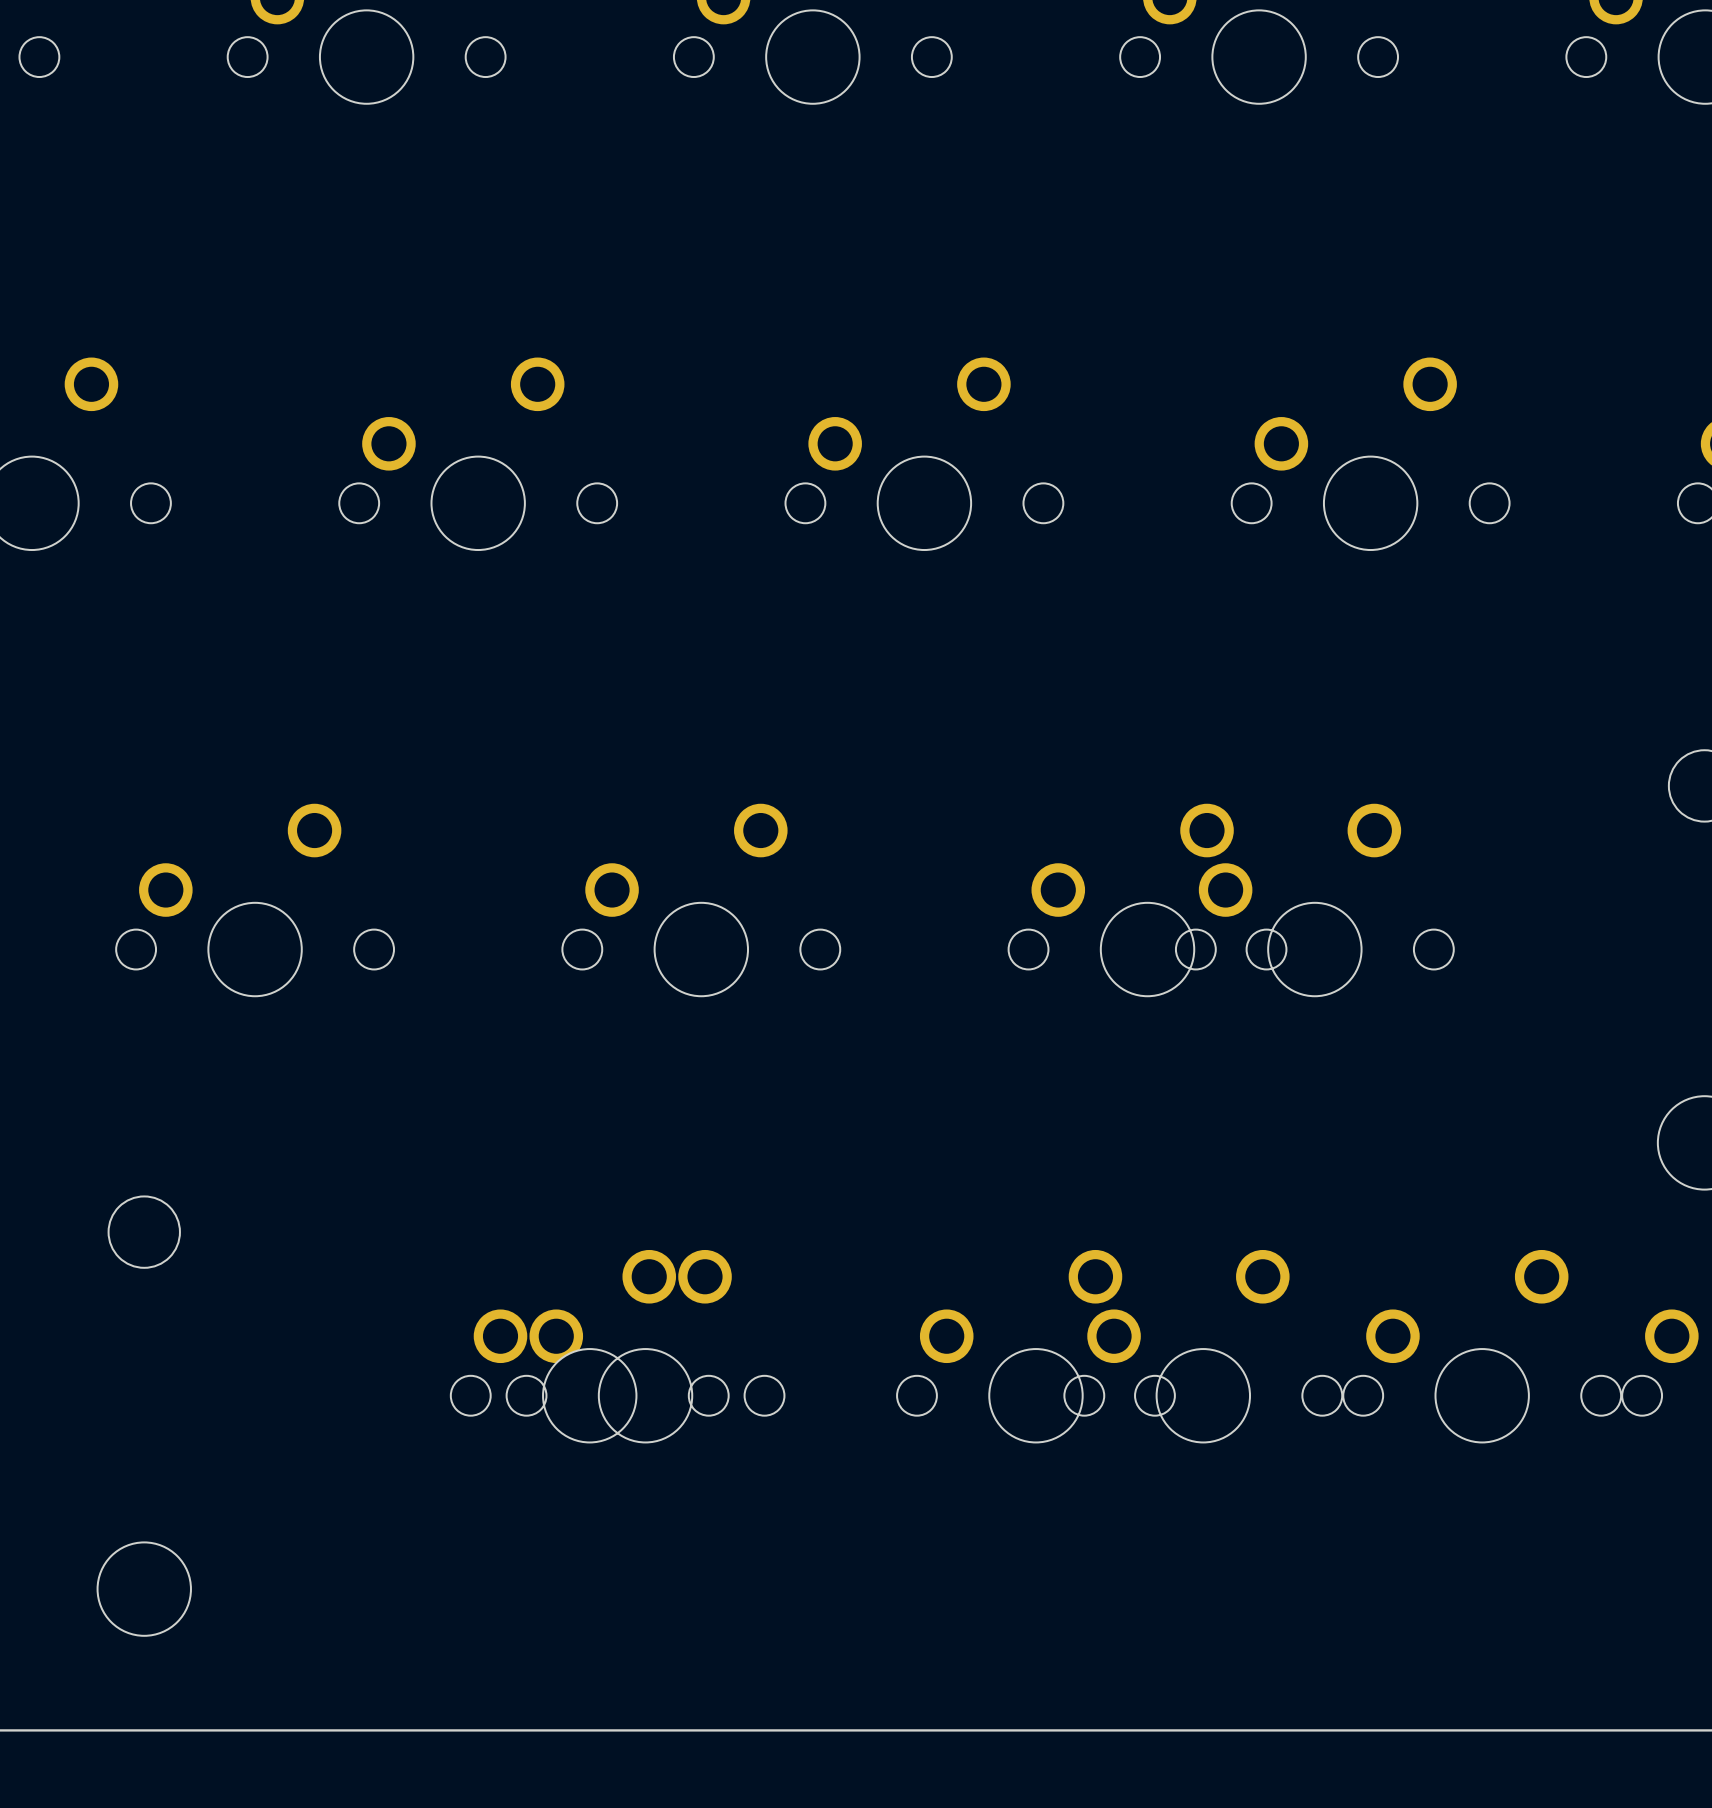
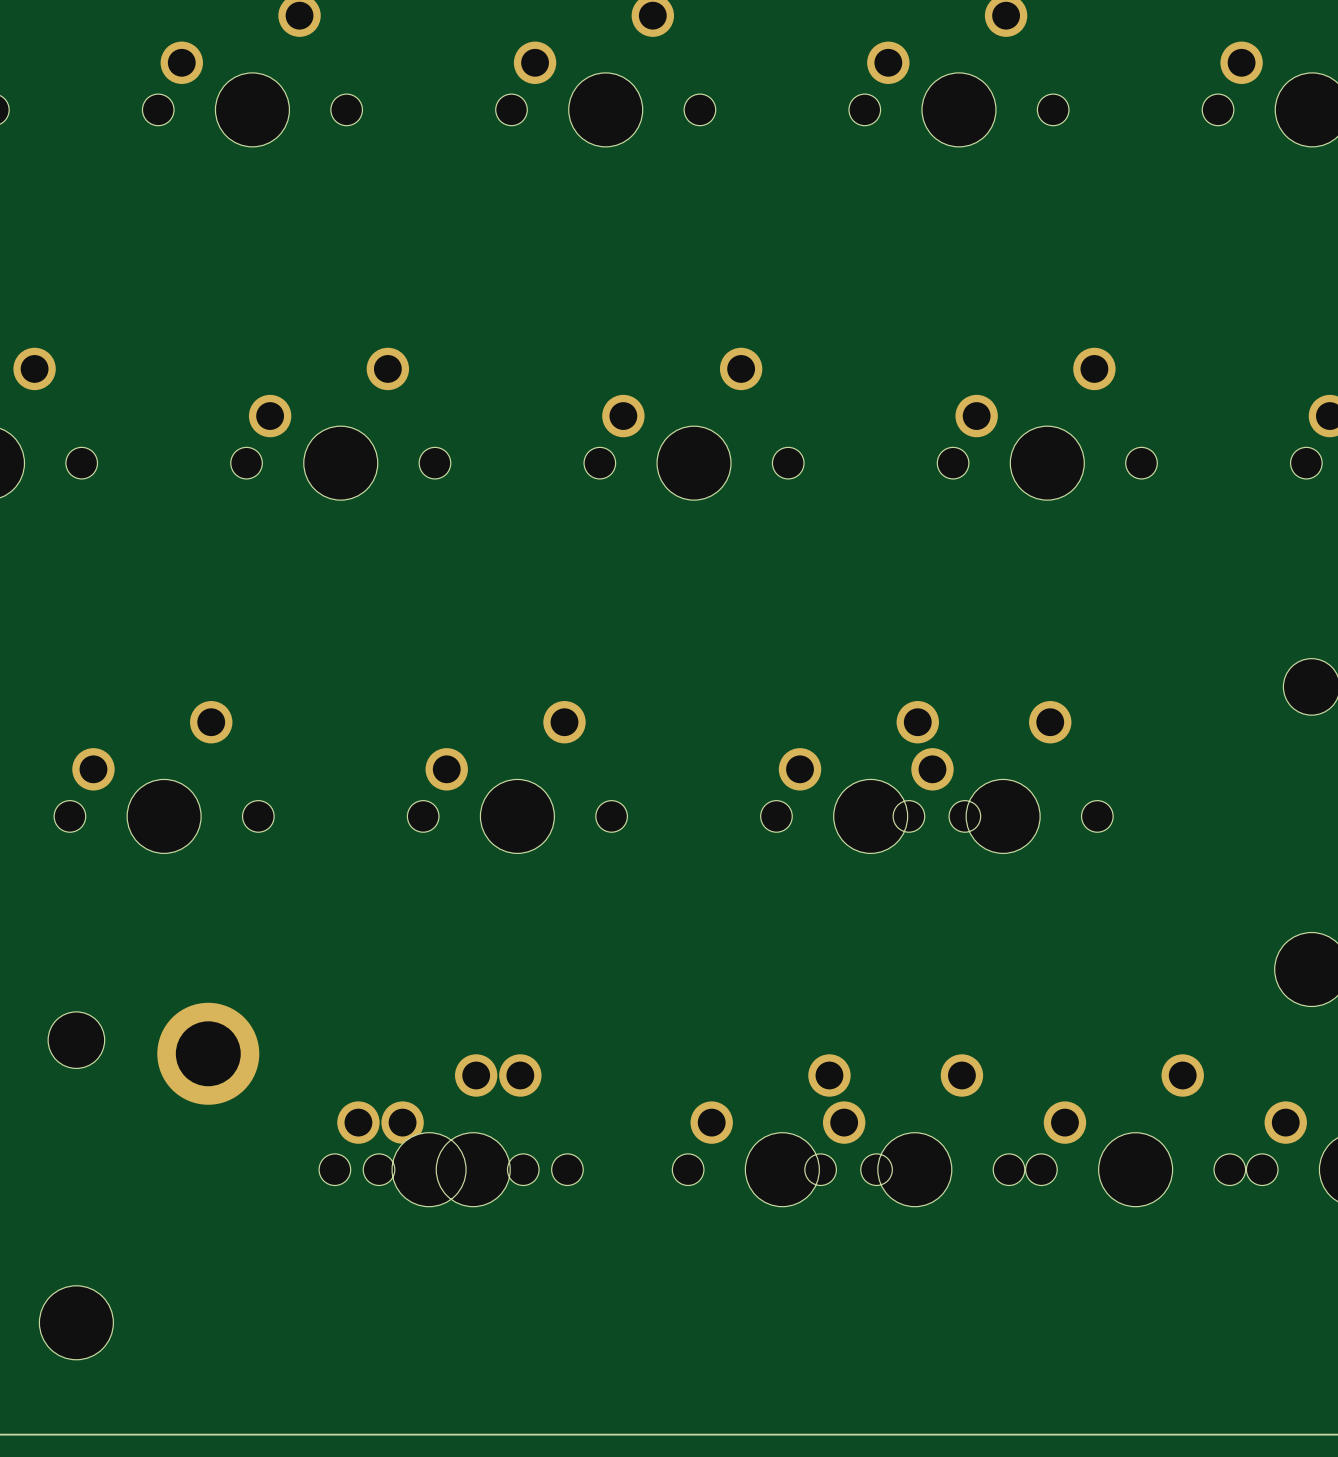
part: none -> (208, 1053)

